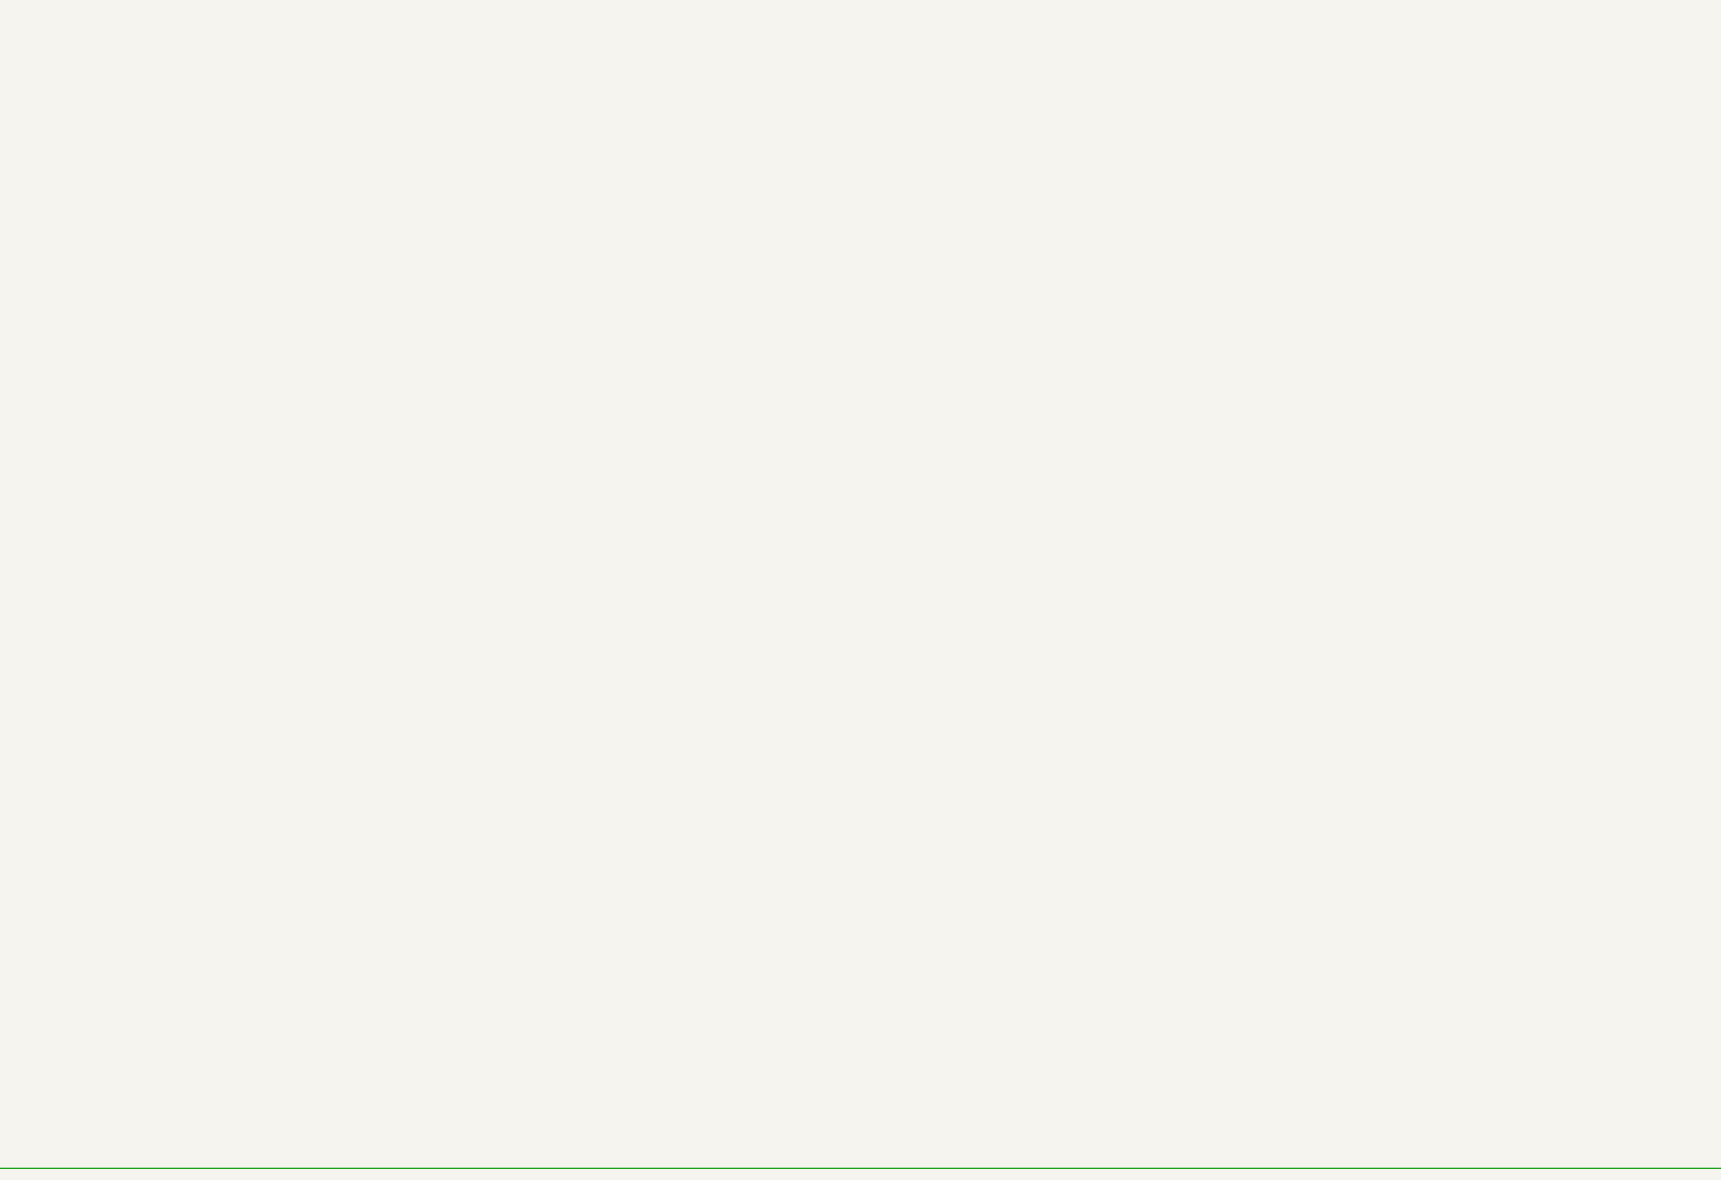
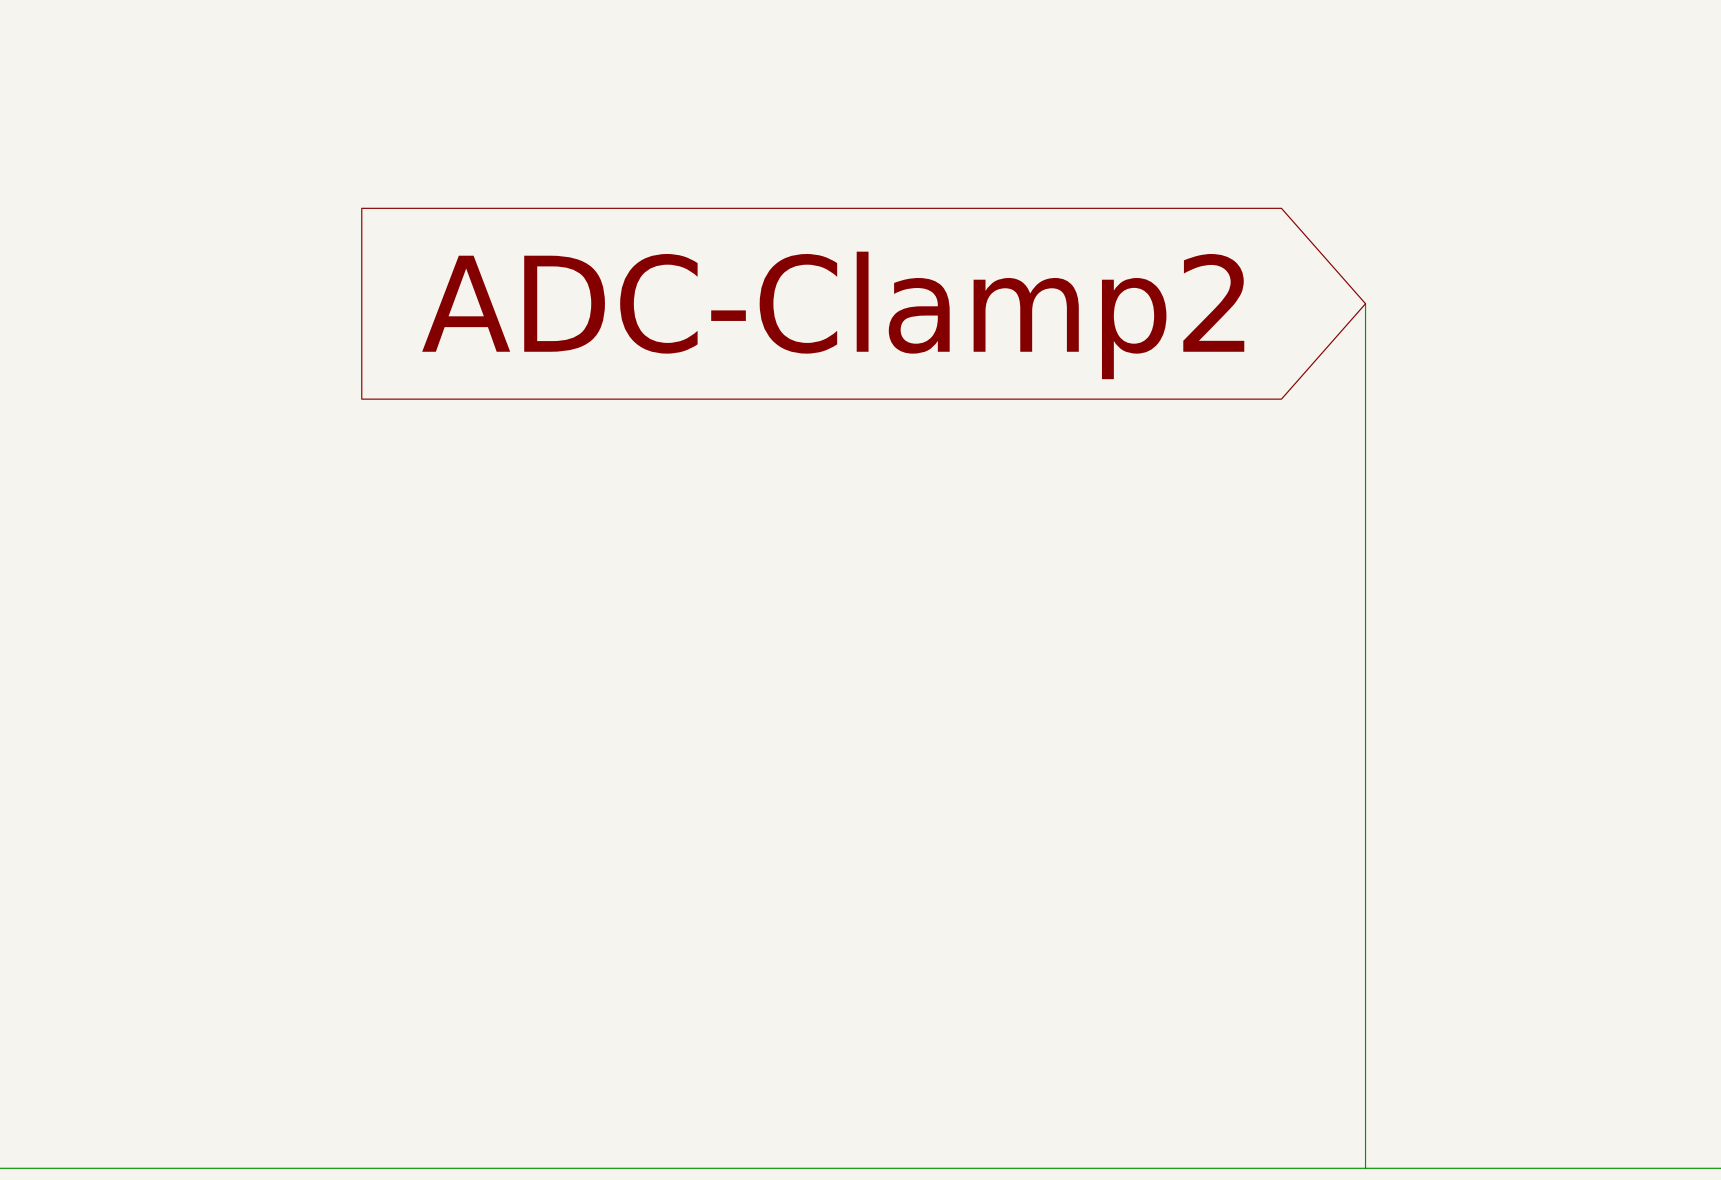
wire: none -> (1365, 303) (1365, 1168)
global label: none -> ADC-Clamp2 (833, 315)

